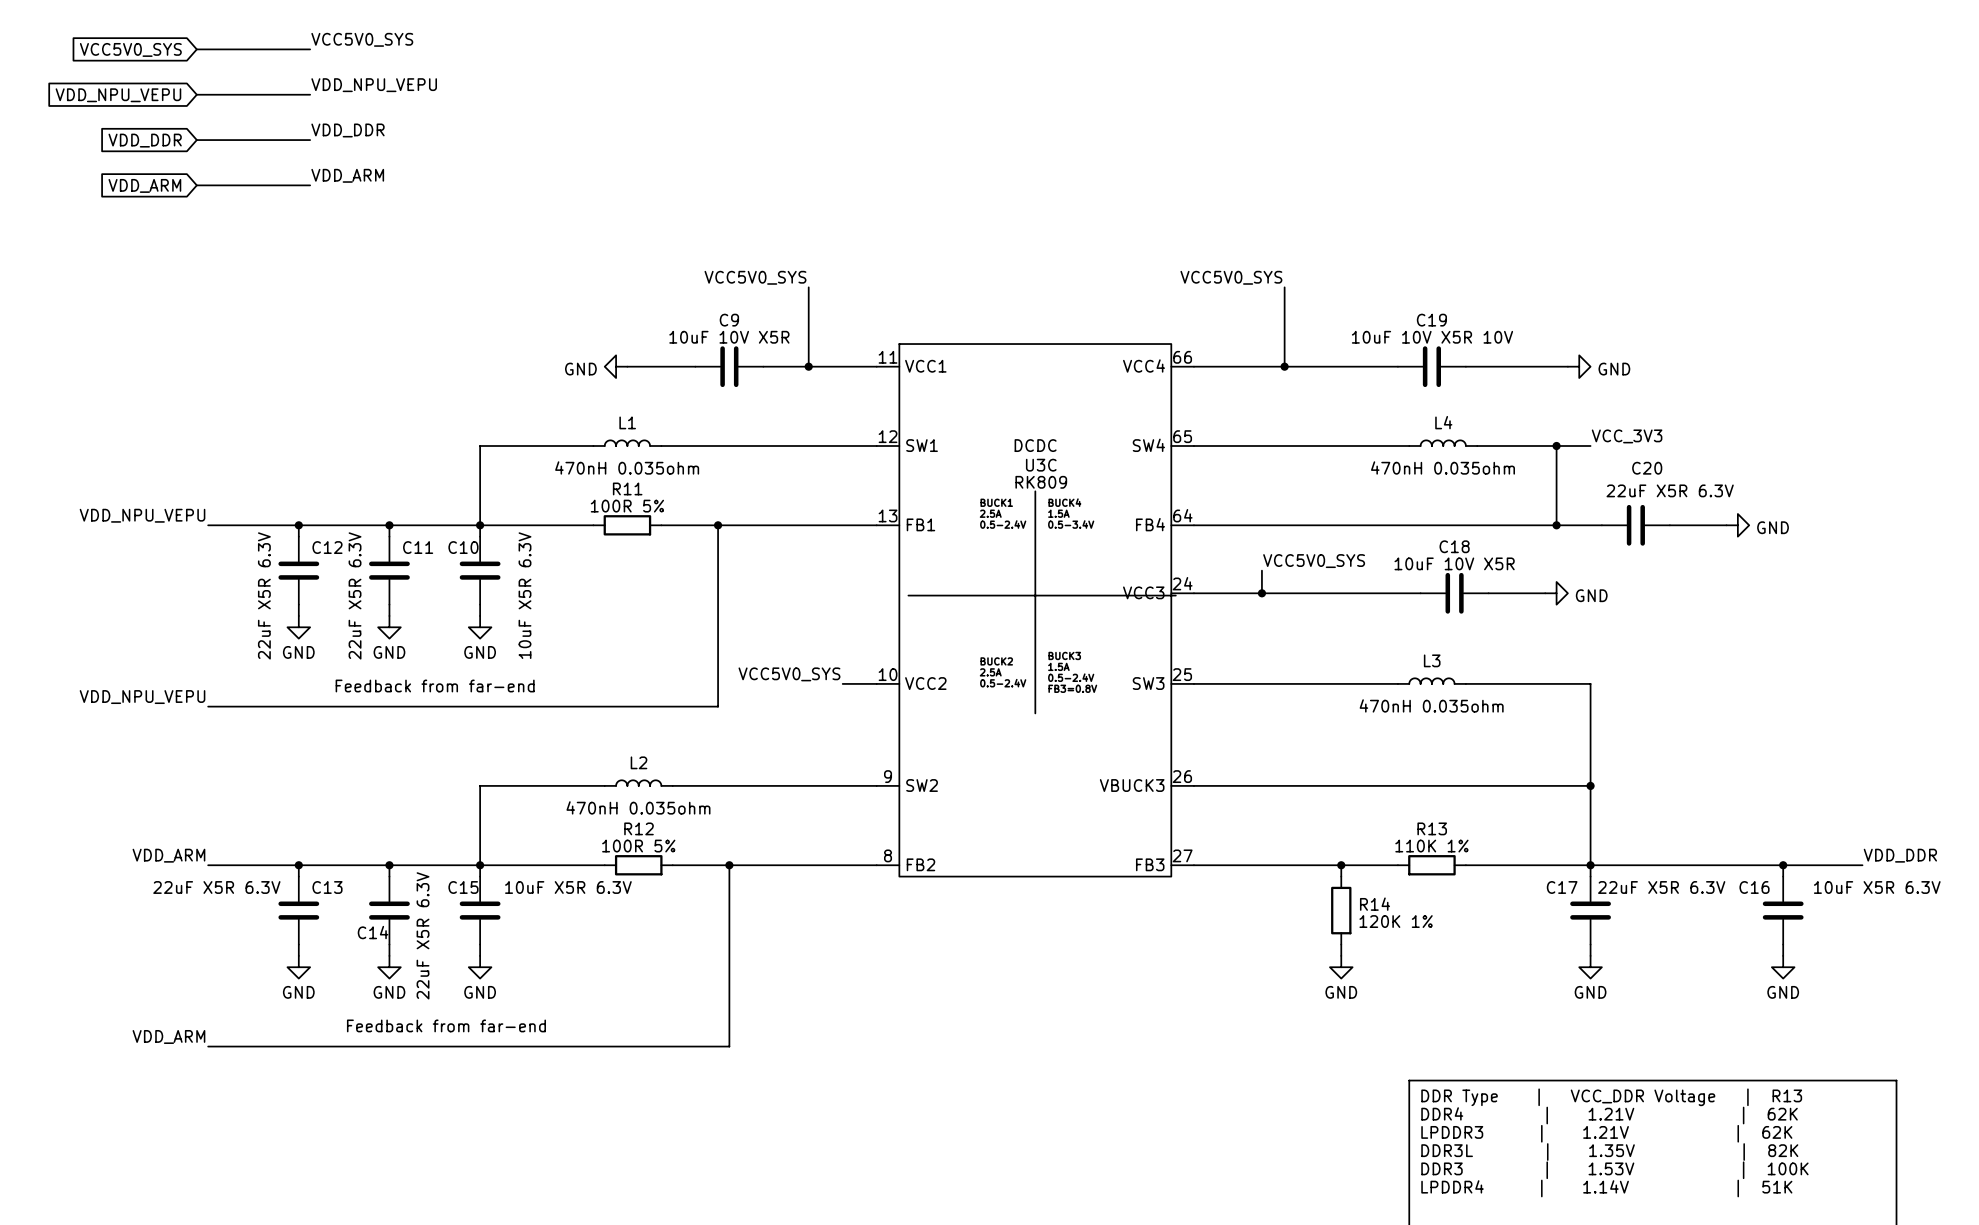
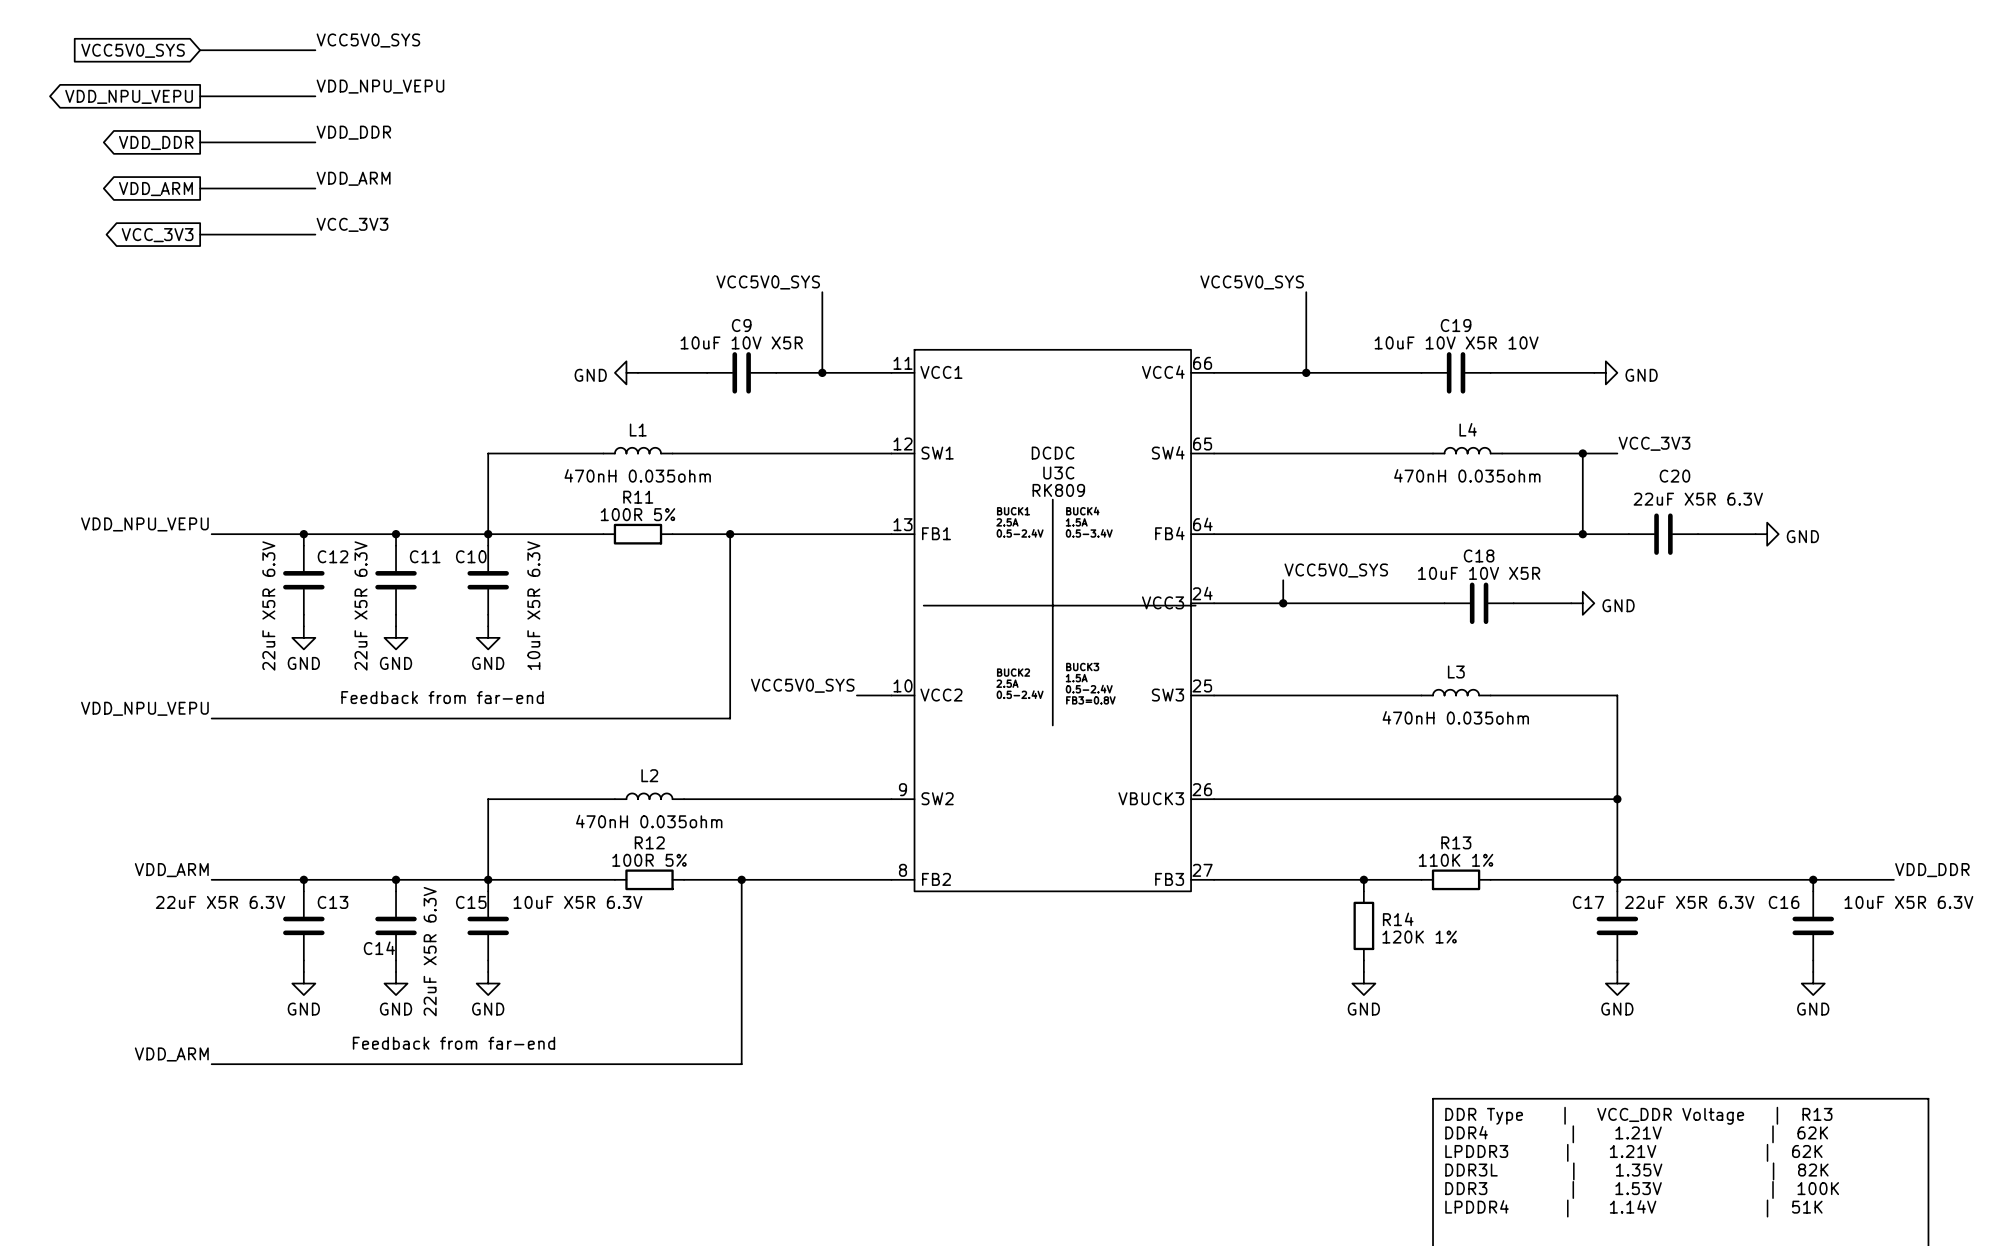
global label shape: input (118, 95) -> output (129, 96)
global label shape: input (145, 140) -> output (156, 142)
global label shape: input (144, 185) -> output (155, 189)
label: none -> VCC_3V3 (352, 224)
wire: none -> (200, 234) (315, 234)
global label: none -> VCC_3V3 (157, 235)

